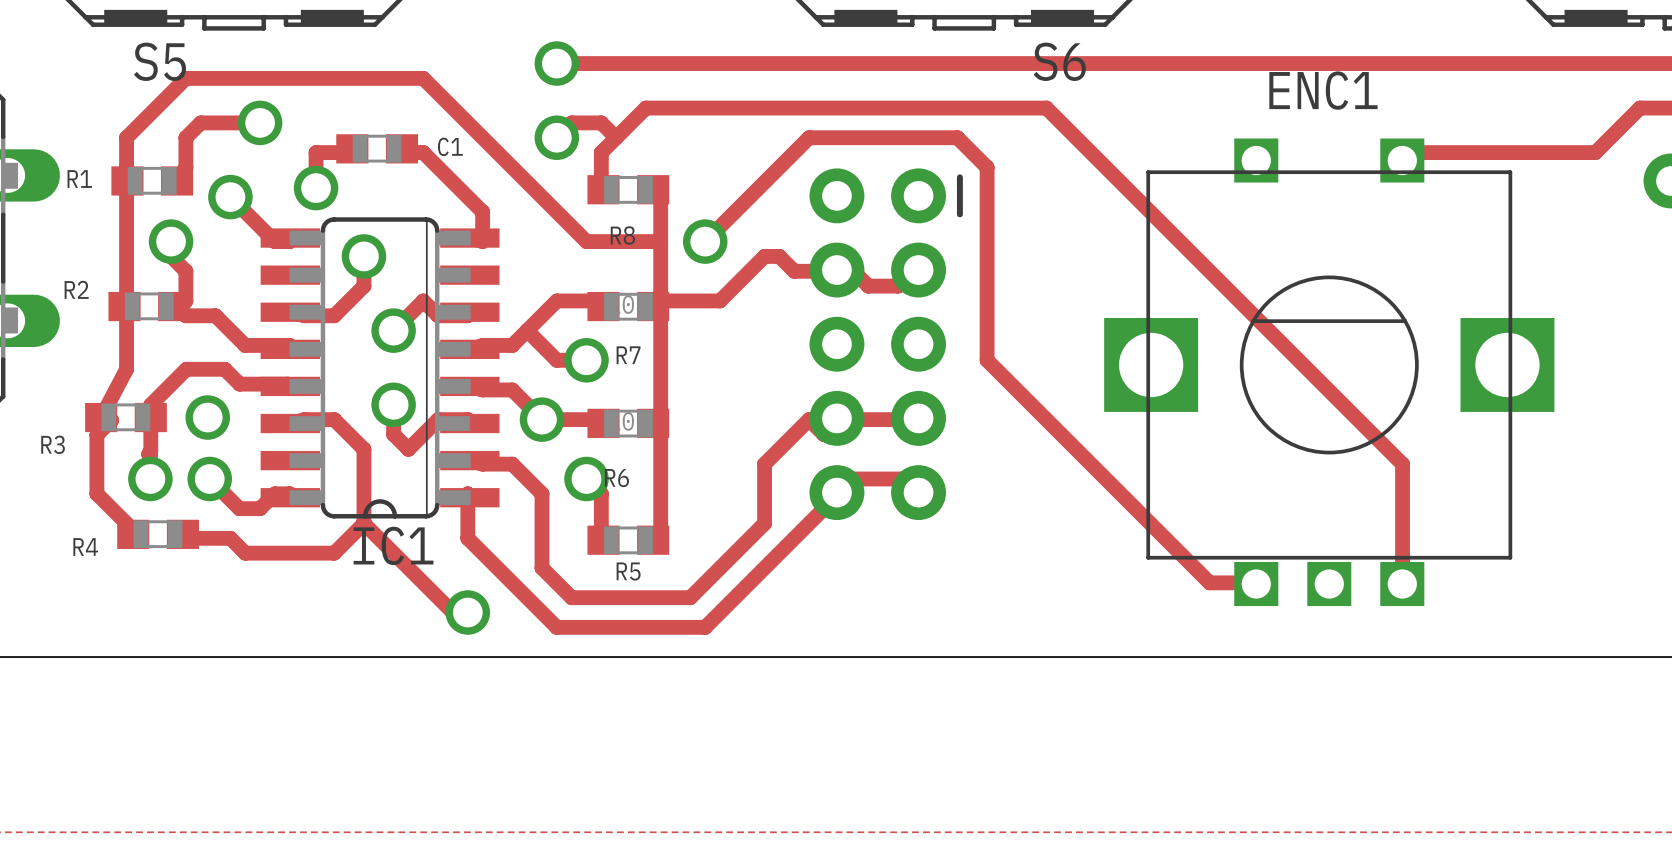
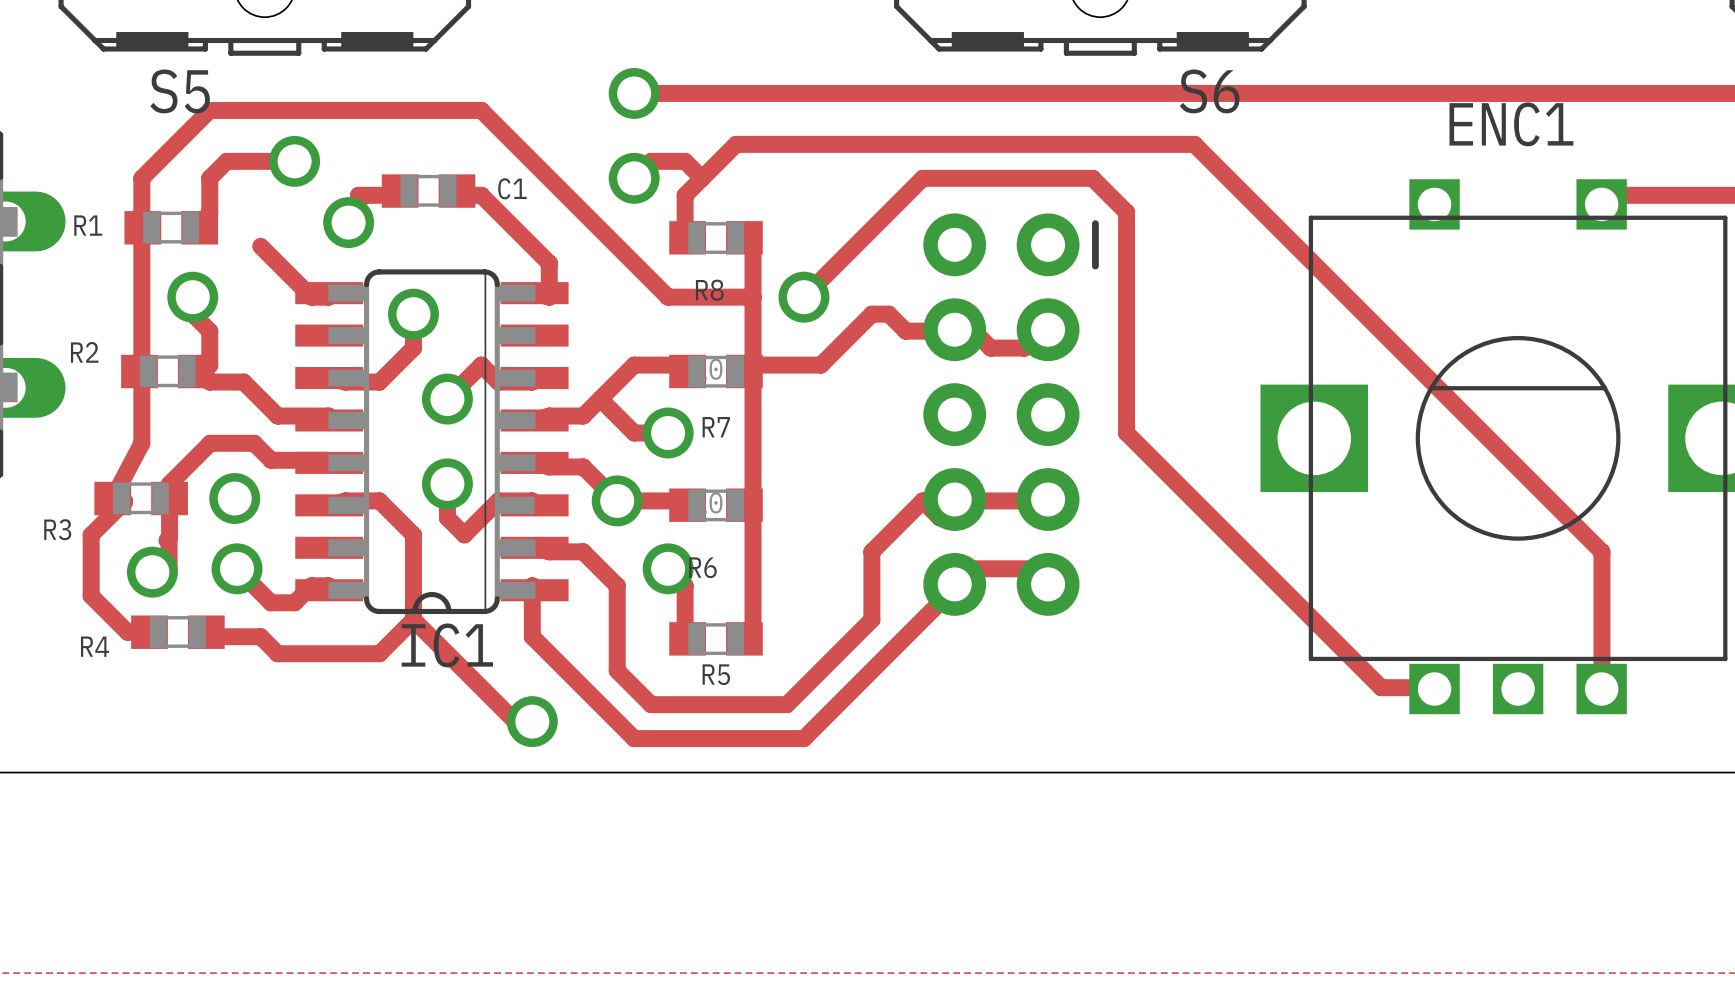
via position: (316, 188) -> (348, 222)
via: (230, 197) -> none
track: (96, 434) (96, 493) (126, 523) (133, 534) -> (107, 518) (91, 535) (91, 595) (127, 632) (149, 632)
via position: (150, 478) -> (152, 572)

